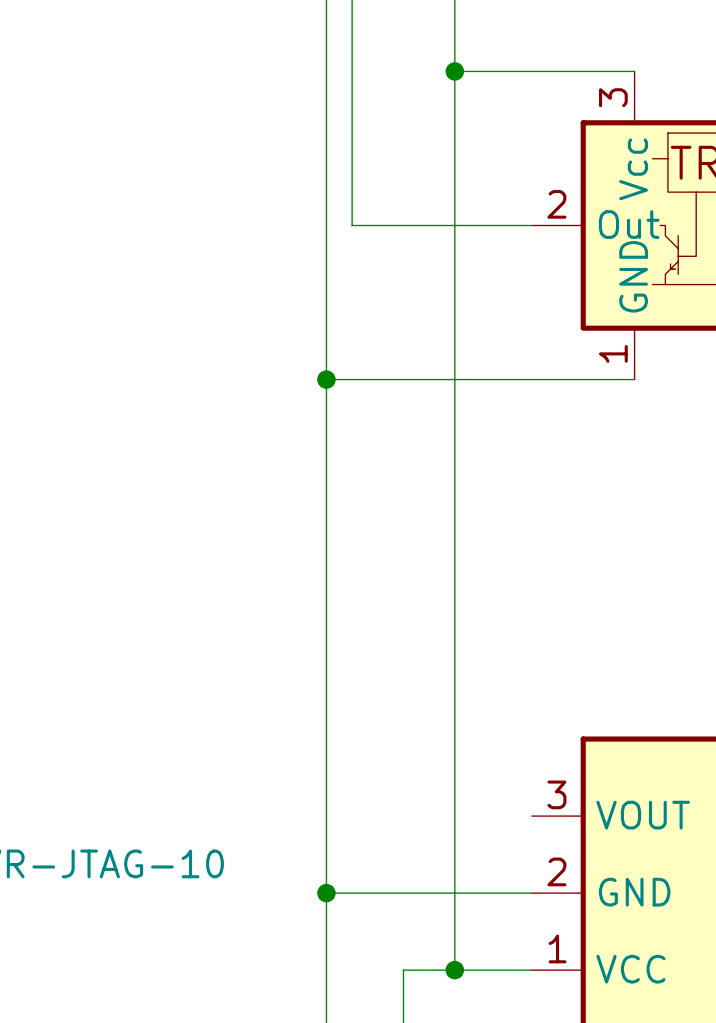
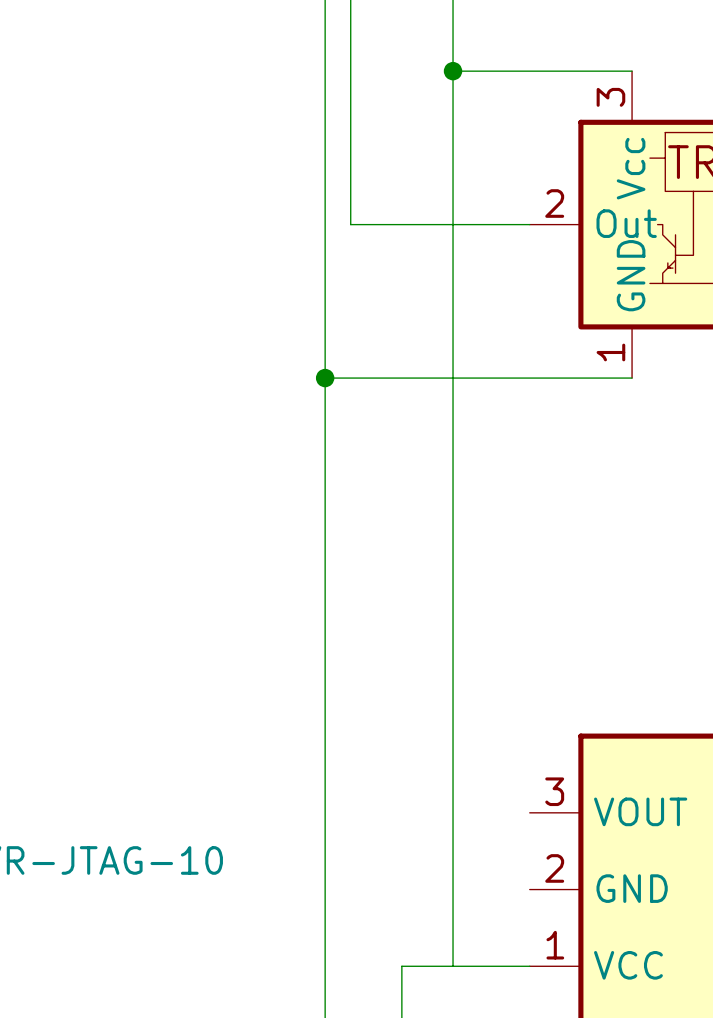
wire: (326, 893) (531, 893) -> none
junction: (326, 893) -> none
junction: (454, 970) -> none

